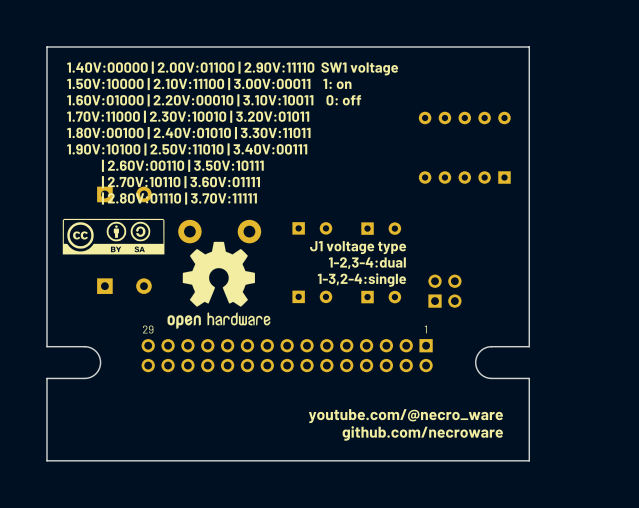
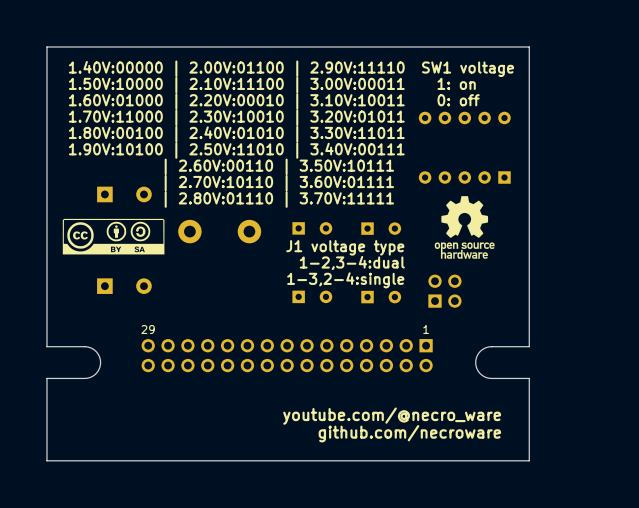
drawing: none -> [434, 196, 495, 259]
drawing: [167, 241, 271, 329] -> none

